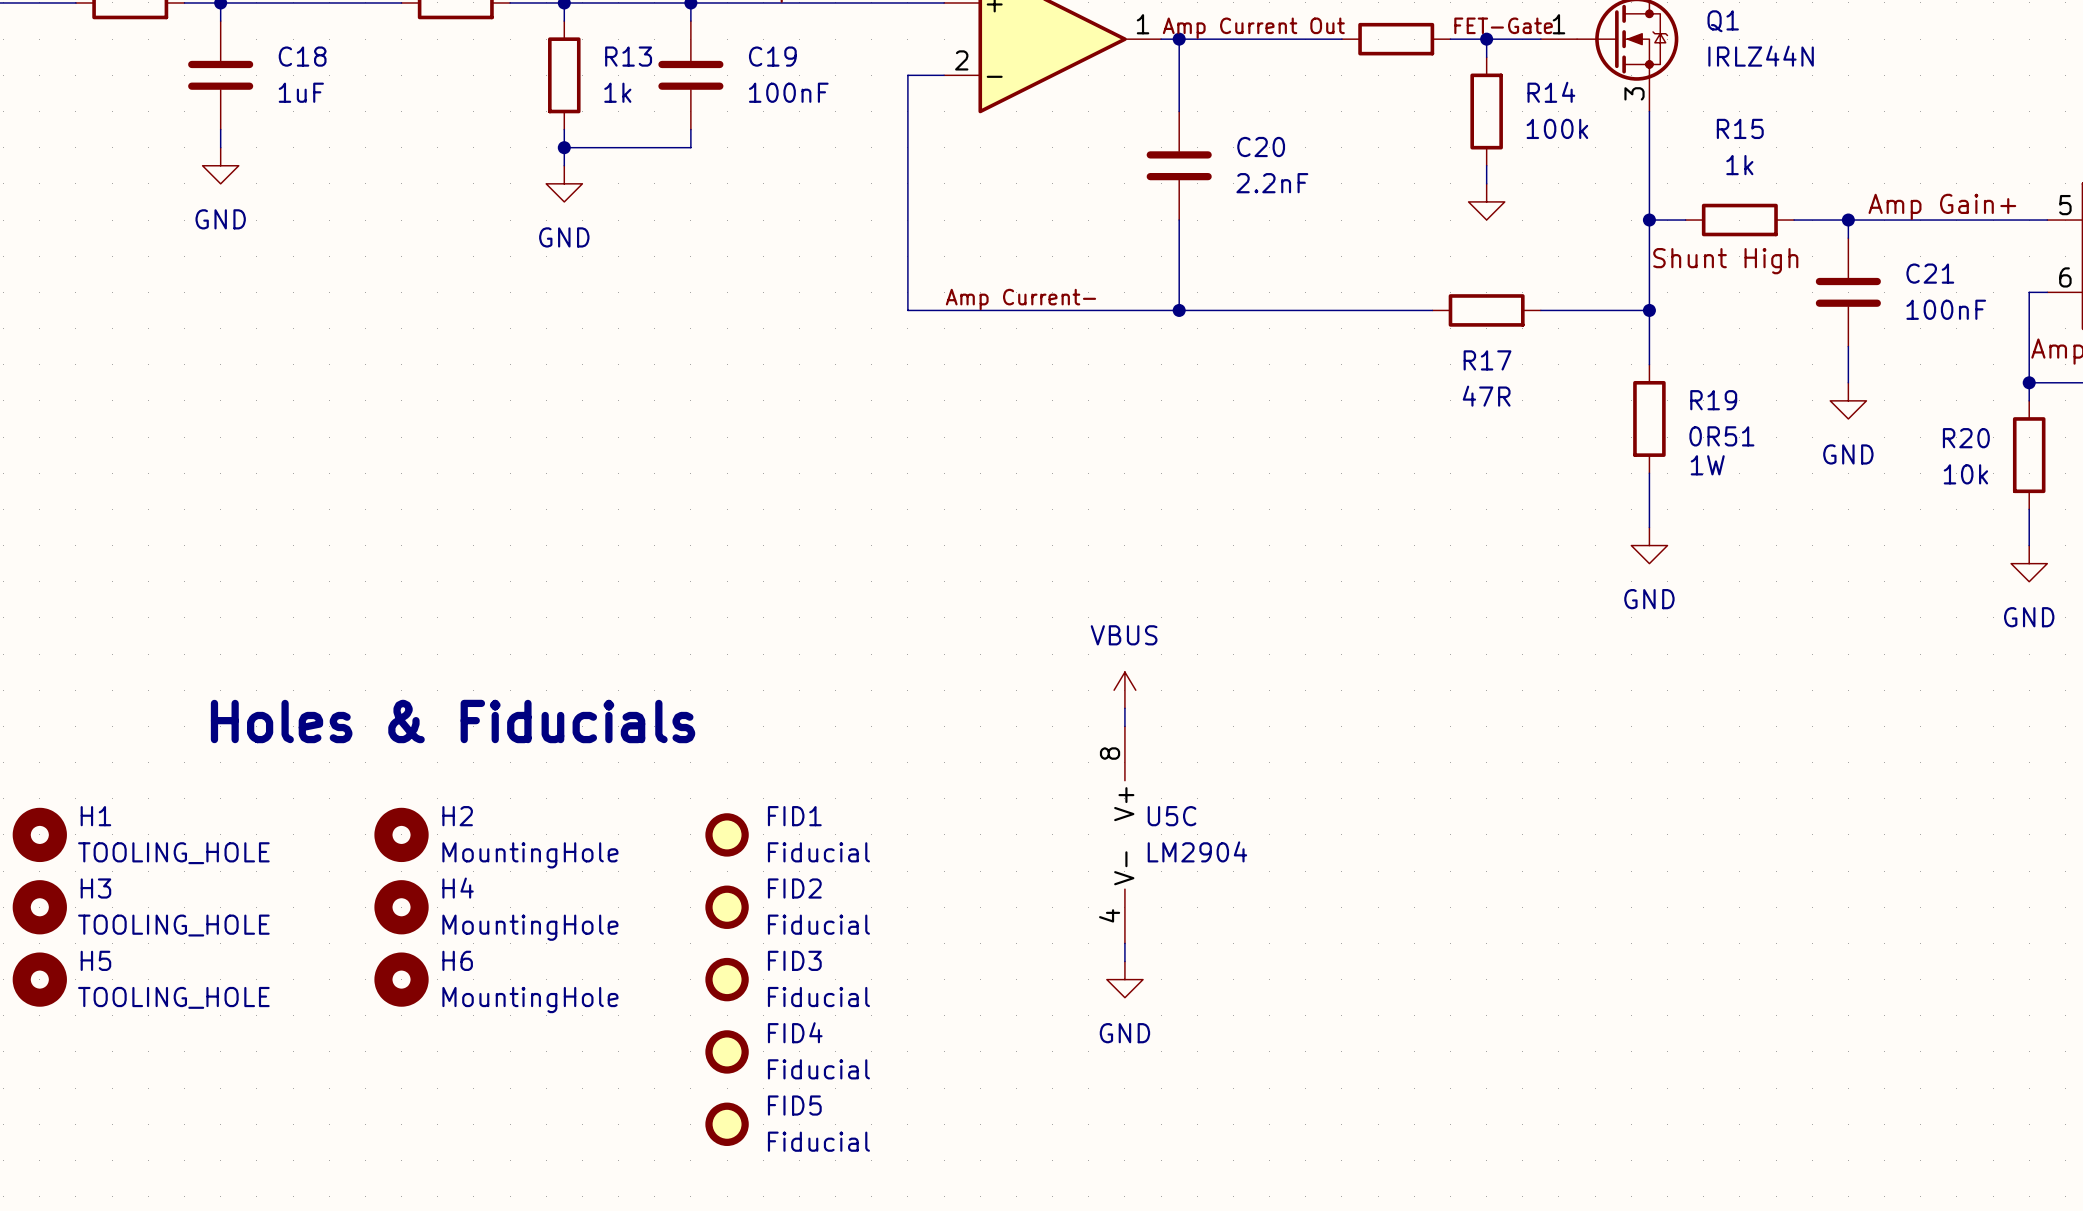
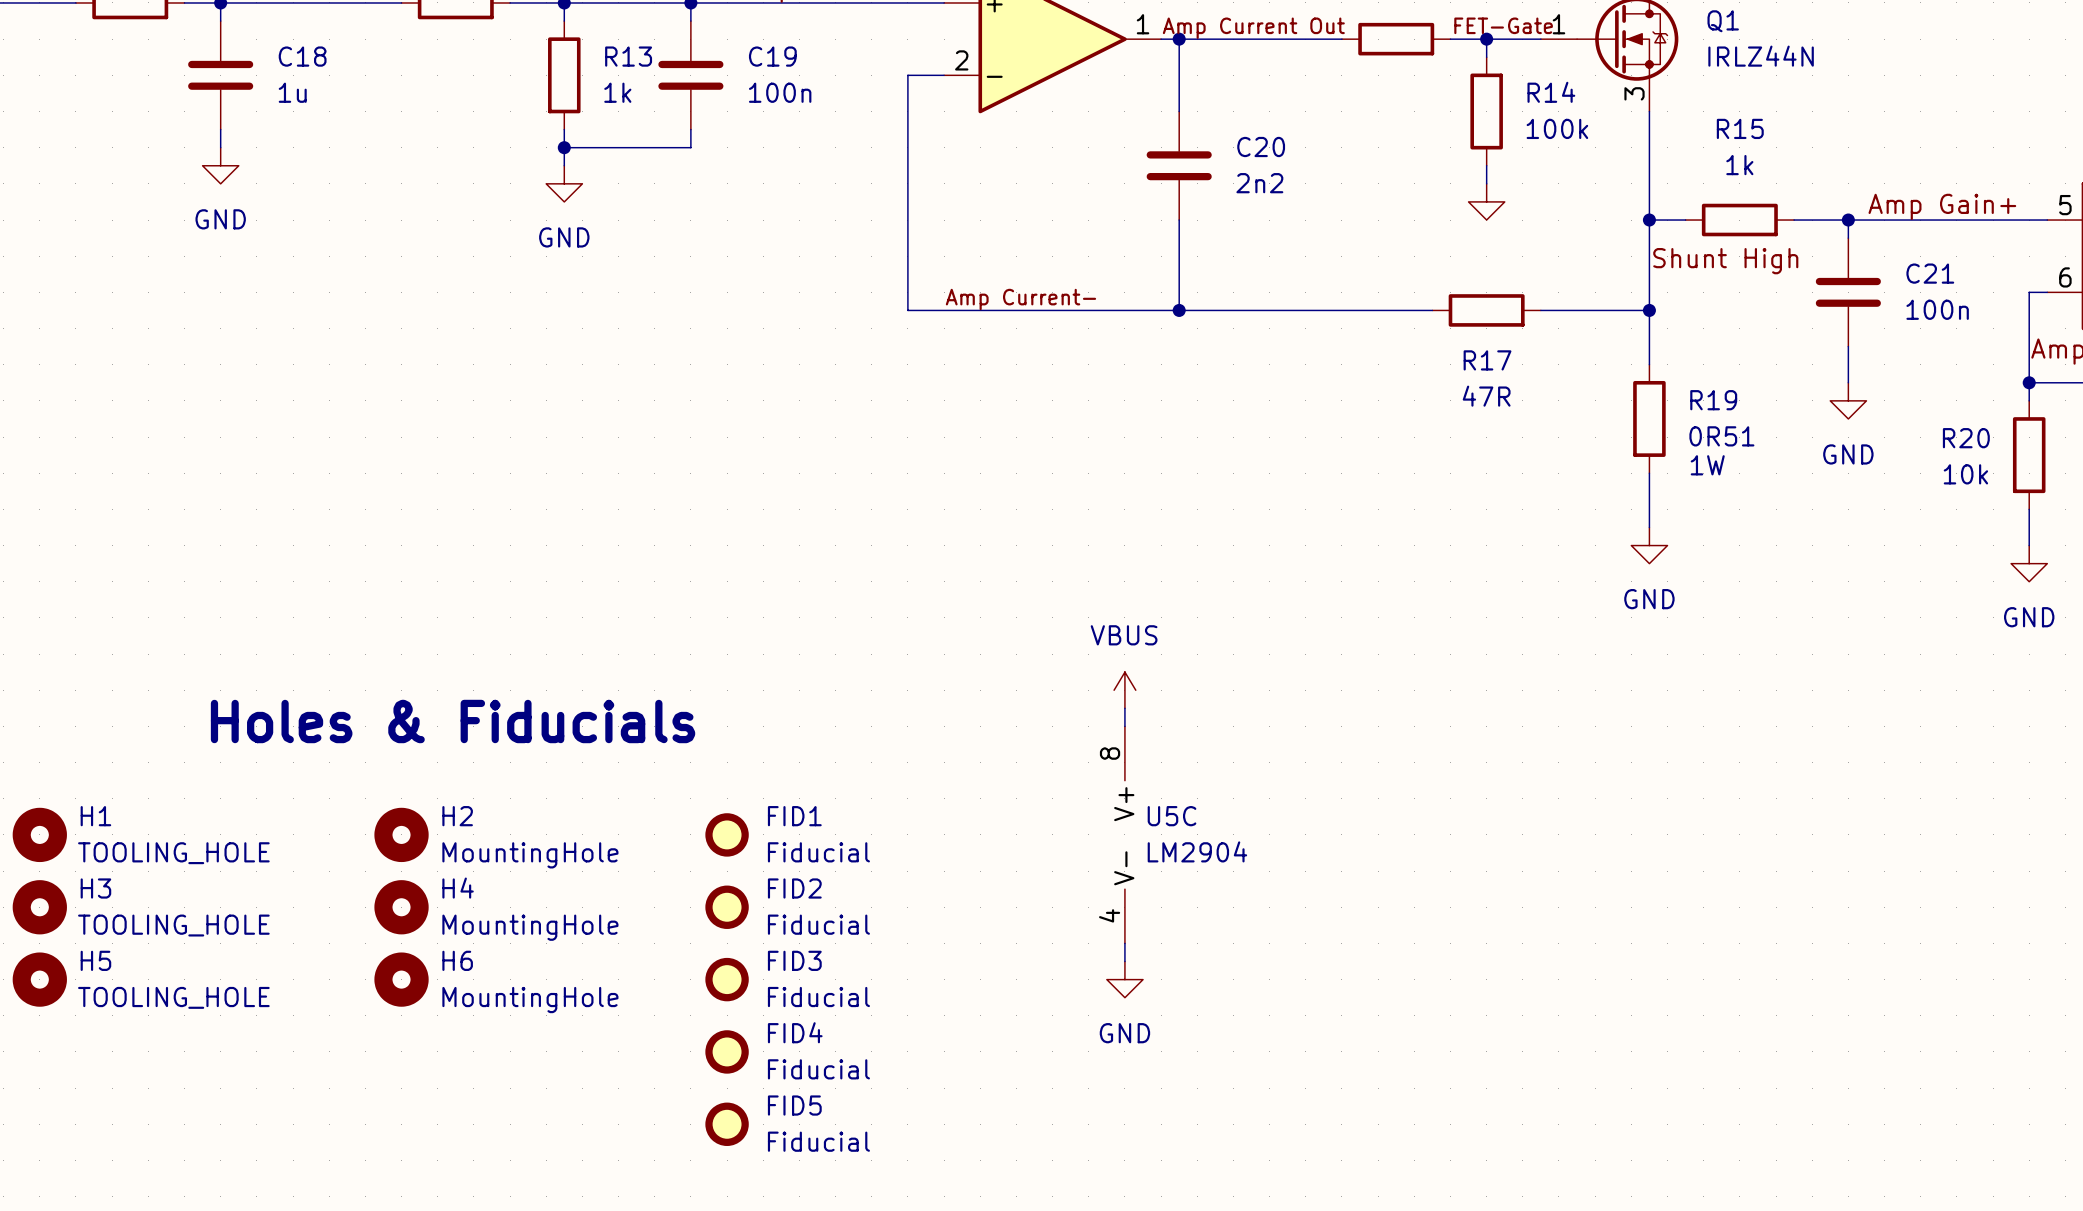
C18 value: 1uF (301, 92) -> 1u (292, 92)
C19 value: 100nF (788, 92) -> 100n (780, 92)
C20 value: 2.2nF (1272, 183) -> 2n2 (1259, 183)
C21 value: 100nF (1946, 309) -> 100n (1937, 309)

